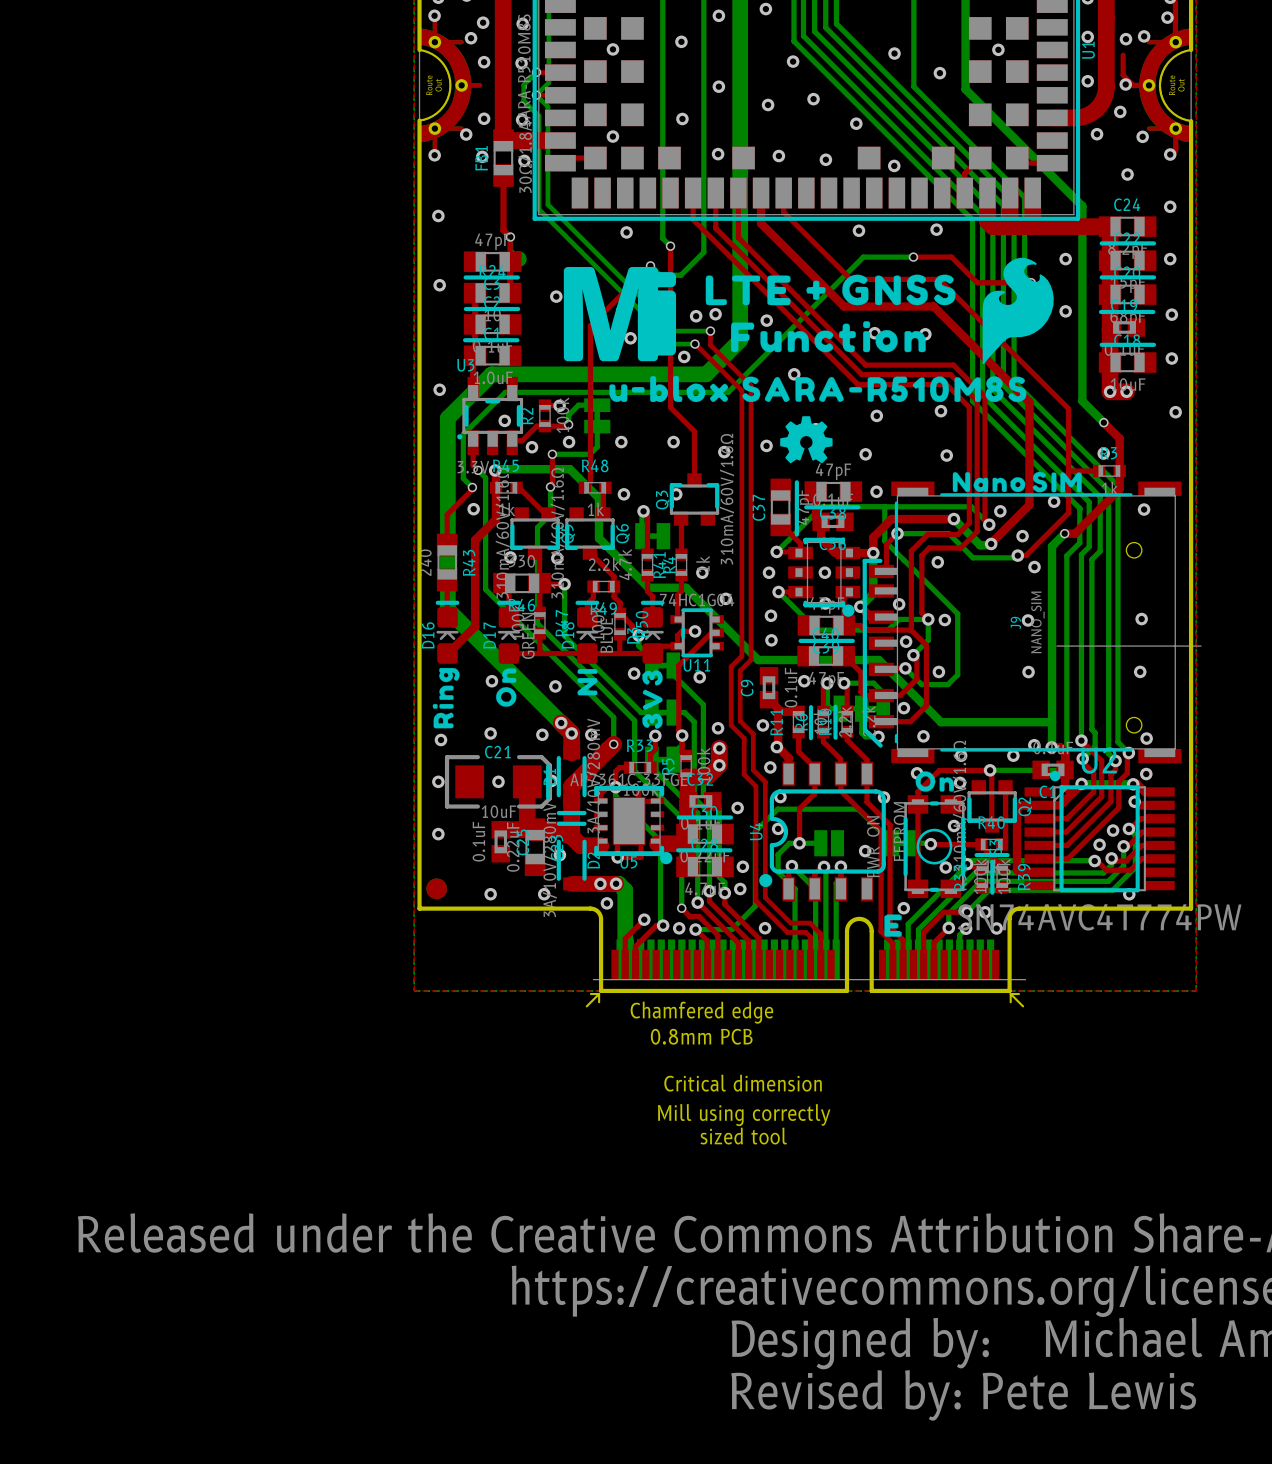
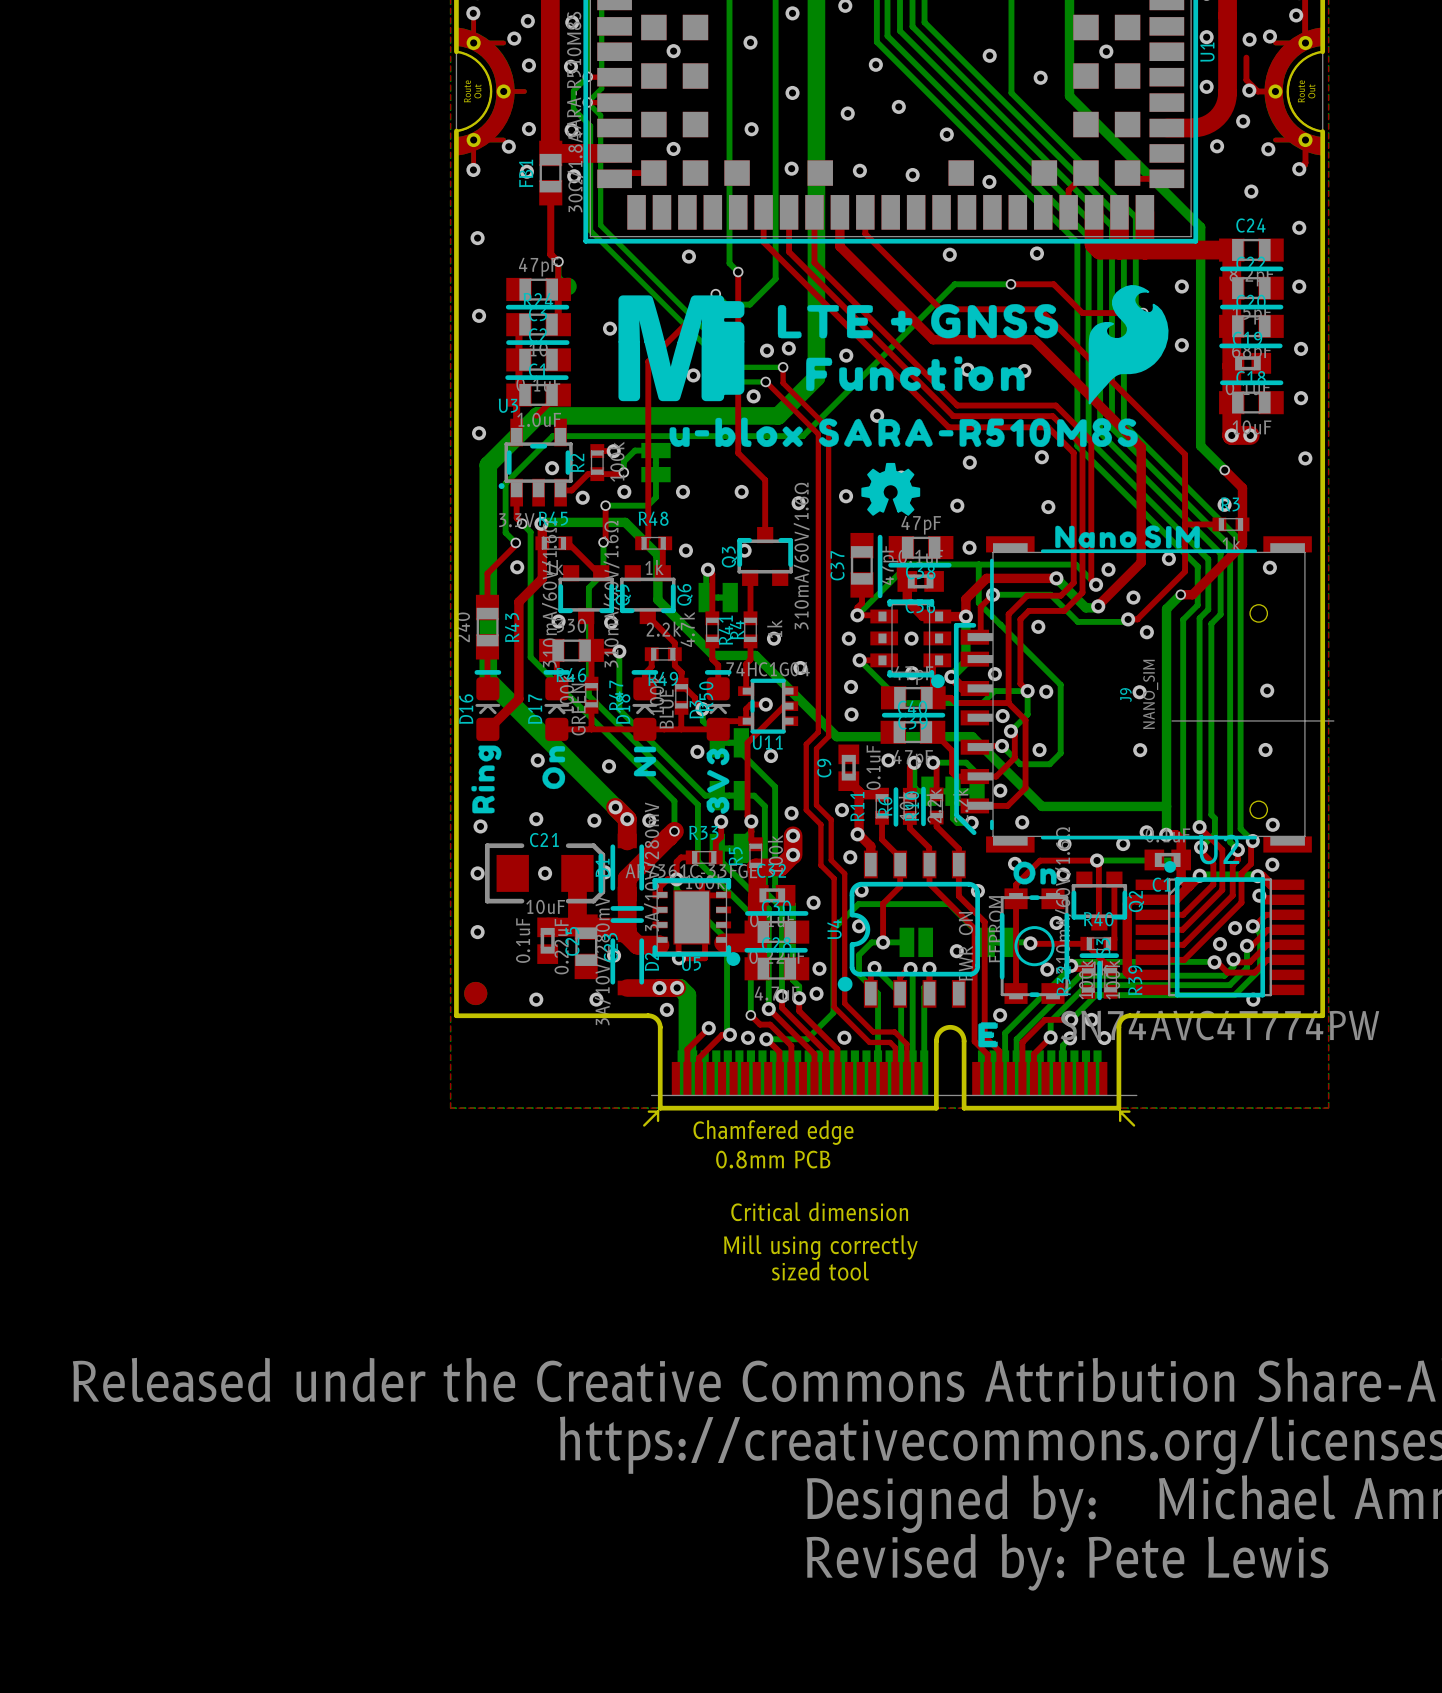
top track: none -> (558, 395) (536, 415)
top track: none -> (862, 584) (862, 602) (857, 607) (857, 615)
top track: (781, 524) (800, 543) (800, 552) -> none

